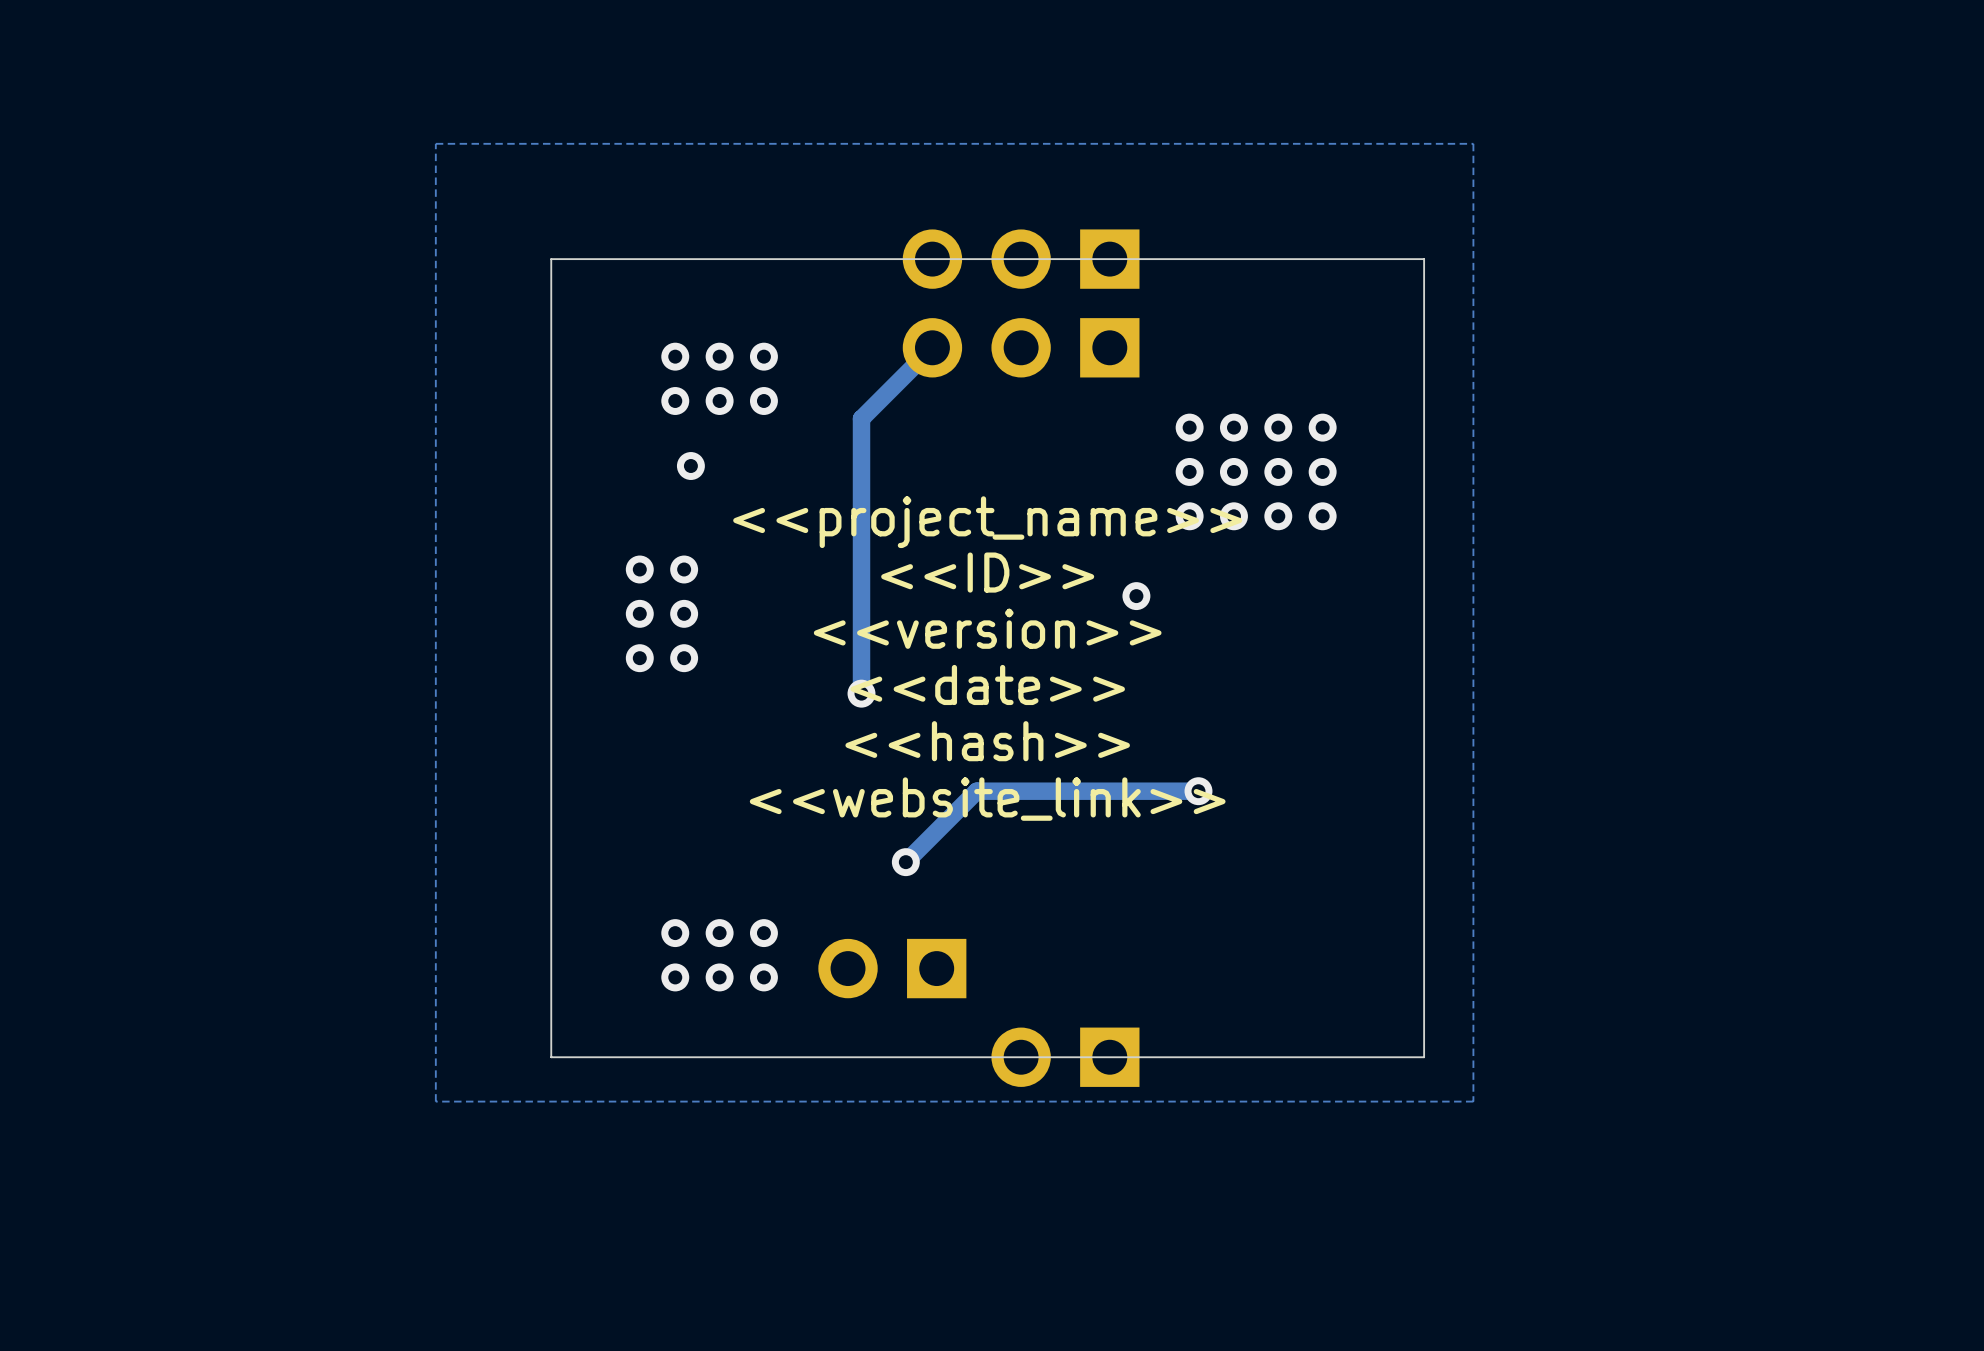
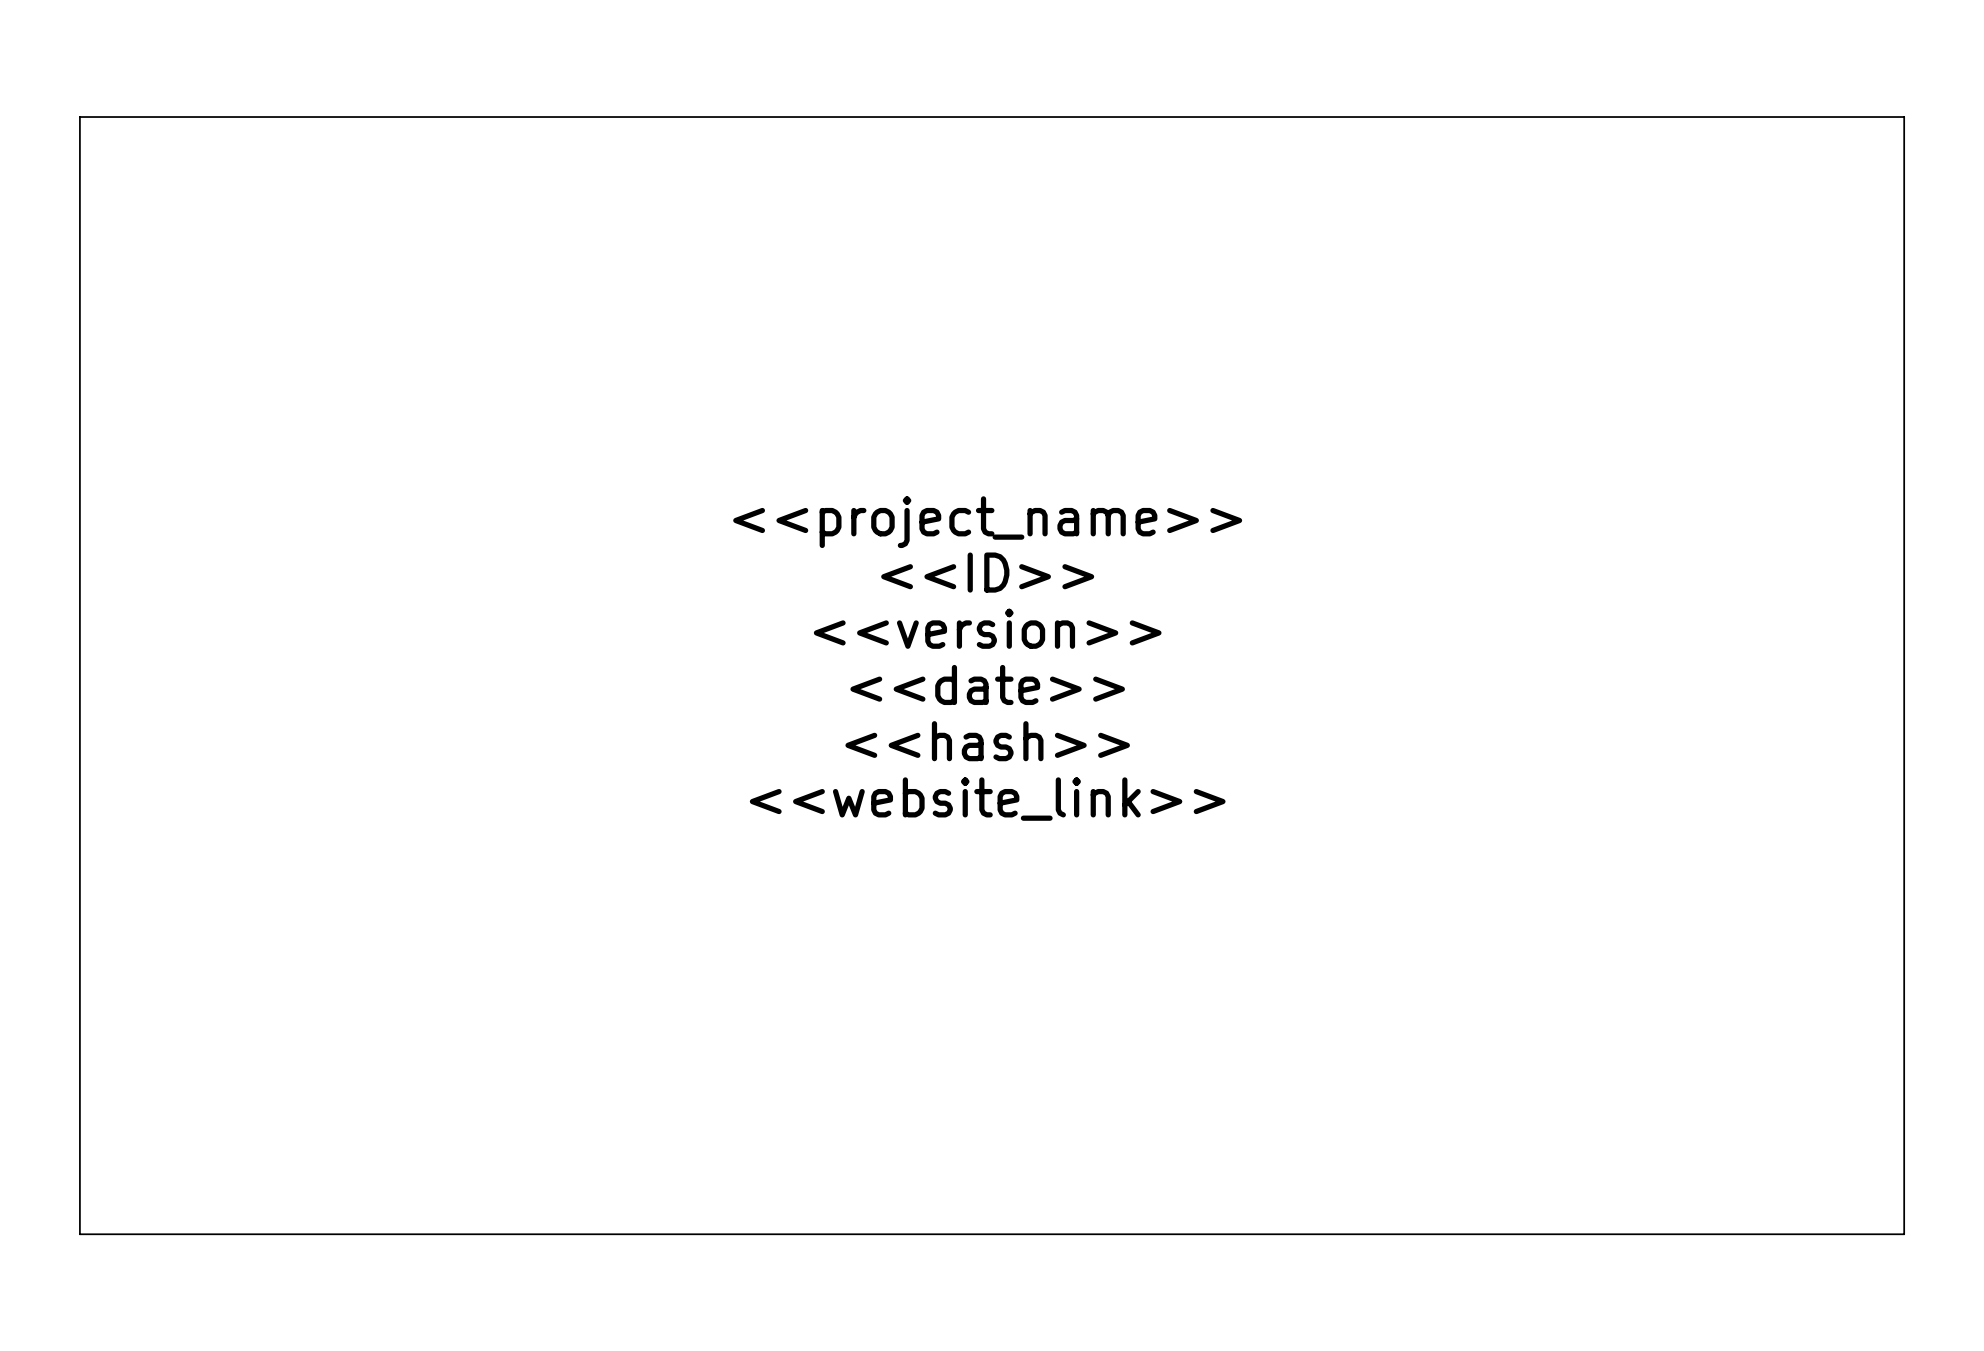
board edge: none -> (1904, 117) (79, 117) (79, 1234) (1904, 1234) (1904, 117)
zone outline: (1473, 143) (435, 143) (435, 1101) (1473, 1101) (1473, 143) -> none
part: (1021, 259) -> none
board edge: (1424, 259) (551, 259) (551, 1057) (1424, 1057) (1424, 259) -> none
track: (932, 347) (861, 418) (861, 693) -> none
part: (1021, 347) -> none
via: (675, 356) -> none
via: (719, 356) -> none
via: (763, 356) -> none
via: (675, 401) -> none
via: (719, 401) -> none
via: (763, 401) -> none
via: (1189, 427) -> none
via: (1233, 427) -> none
via: (1278, 427) -> none
via: (1322, 427) -> none
via: (690, 466) -> none
via: (1189, 471) -> none
via: (1233, 471) -> none
via: (1278, 471) -> none
via: (1322, 471) -> none
via: (1189, 516) -> none
via: (1233, 516) -> none
via: (1278, 516) -> none
via: (1322, 516) -> none
via: (639, 569) -> none
via: (684, 569) -> none
via: (1136, 596) -> none
via: (639, 613) -> none
via: (684, 613) -> none
via: (639, 658) -> none
via: (684, 658) -> none
via: (861, 693) -> none
track: (1198, 791) (976, 791) (905, 862) -> none
via: (1198, 791) -> none
via: (905, 862) -> none
via: (675, 933) -> none
via: (719, 933) -> none
via: (763, 933) -> none
part: (892, 968) -> none
via: (675, 977) -> none
via: (719, 977) -> none
via: (763, 977) -> none
part: (1065, 1057) -> none

